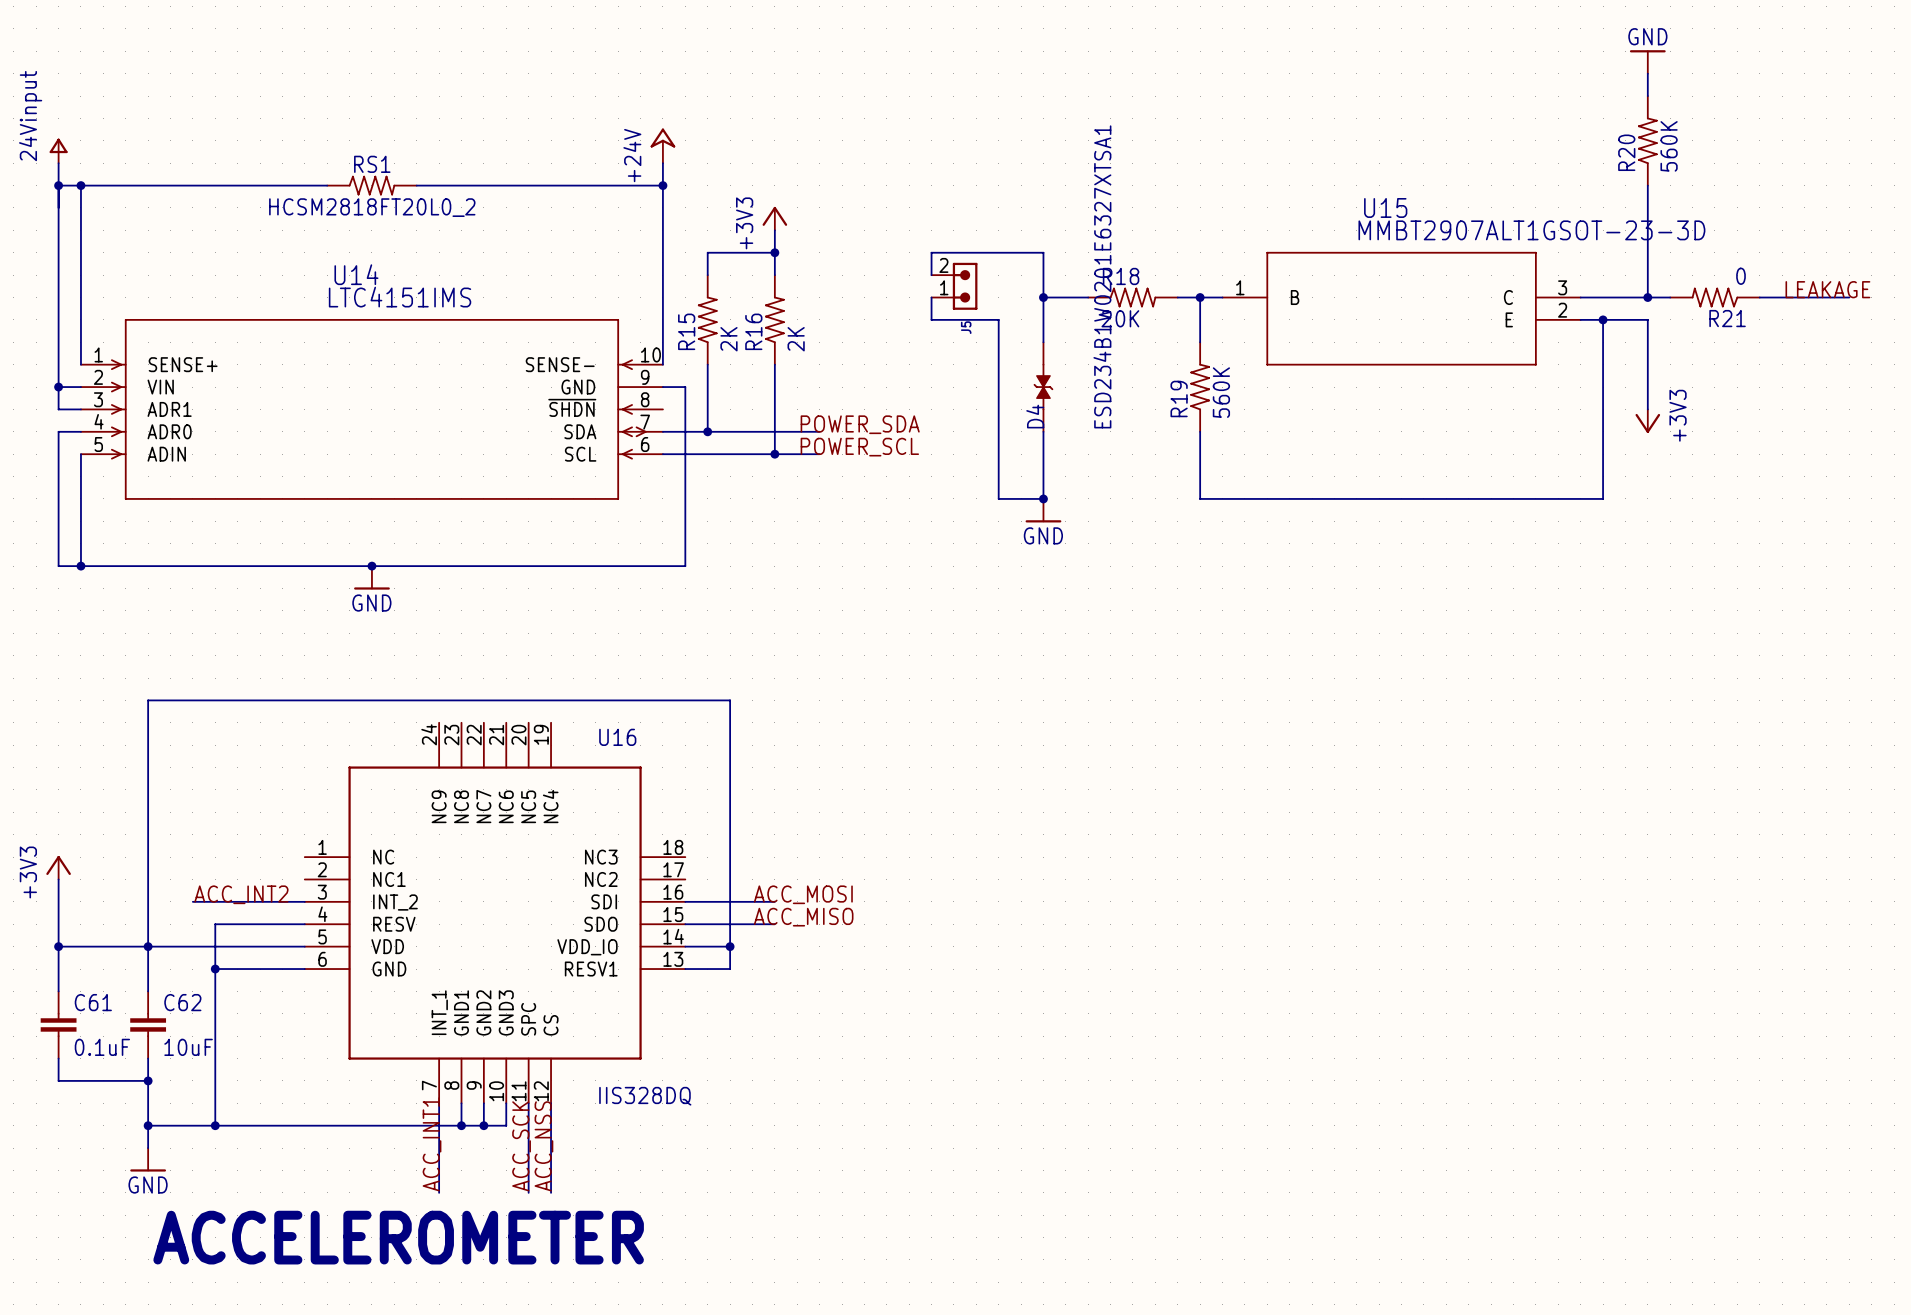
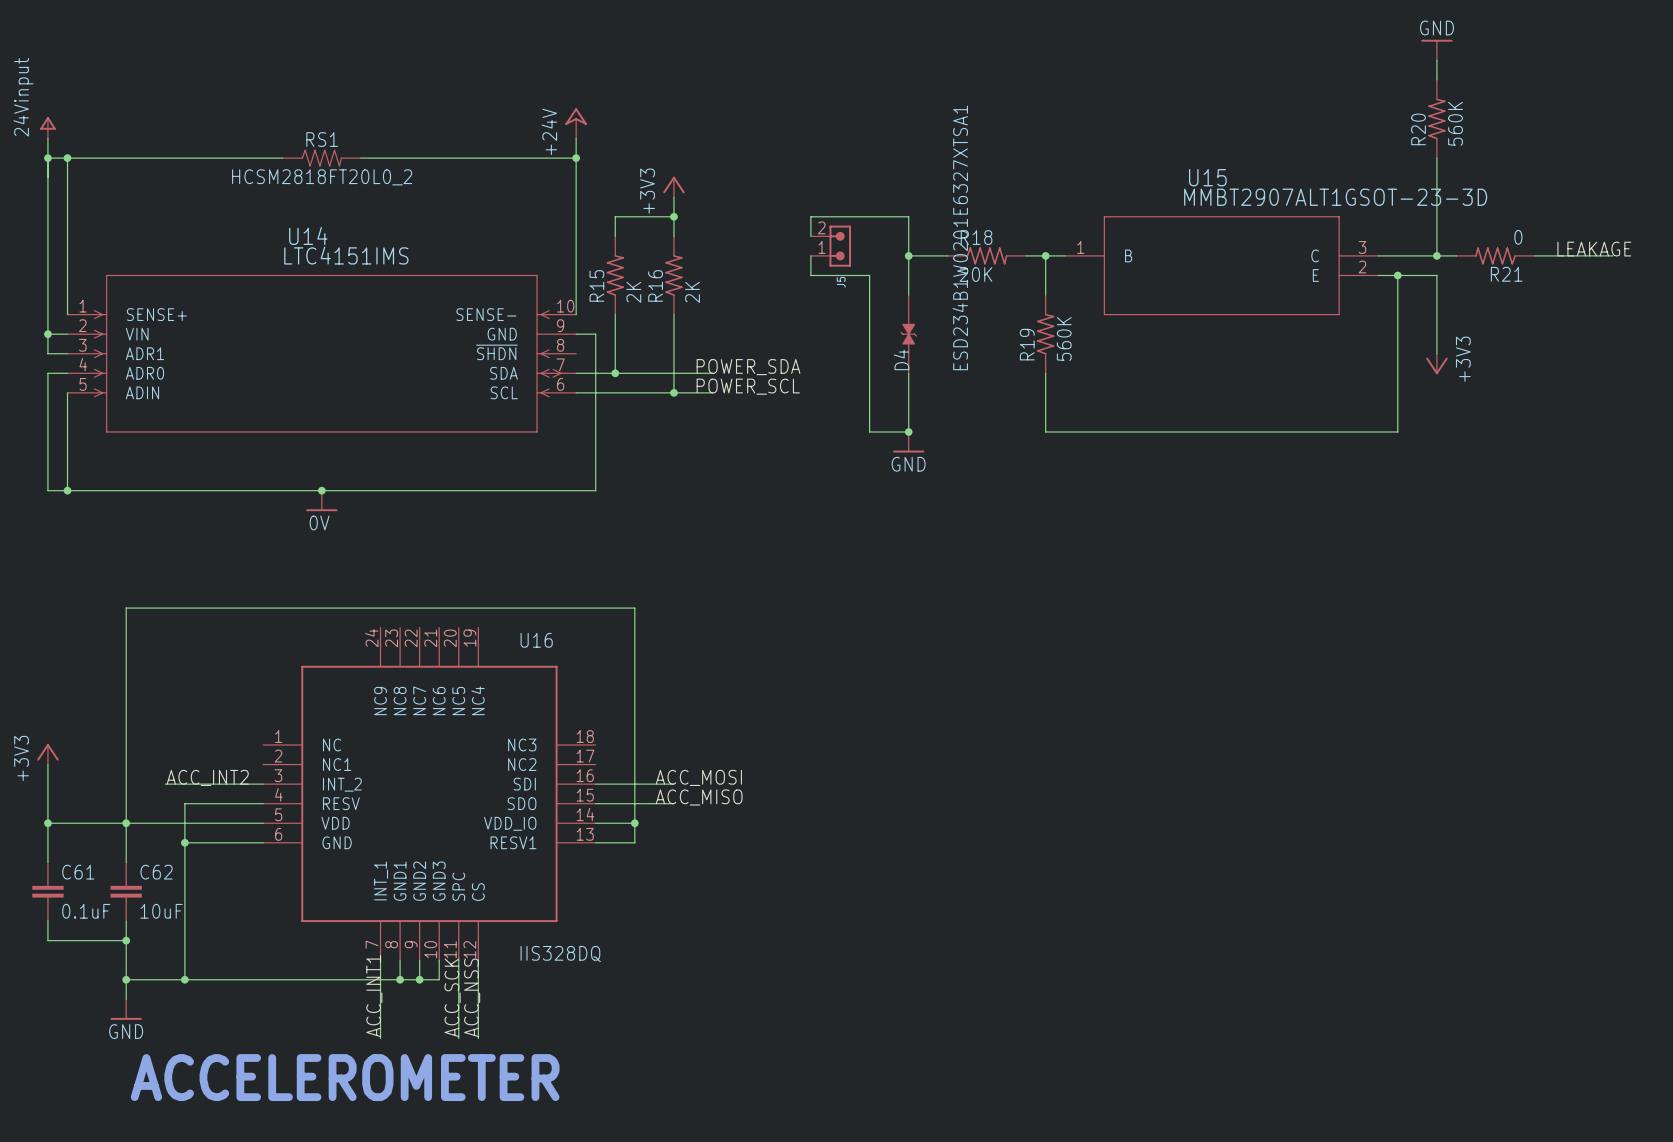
power symbol: GND (371, 577) -> 0V (321, 500)

